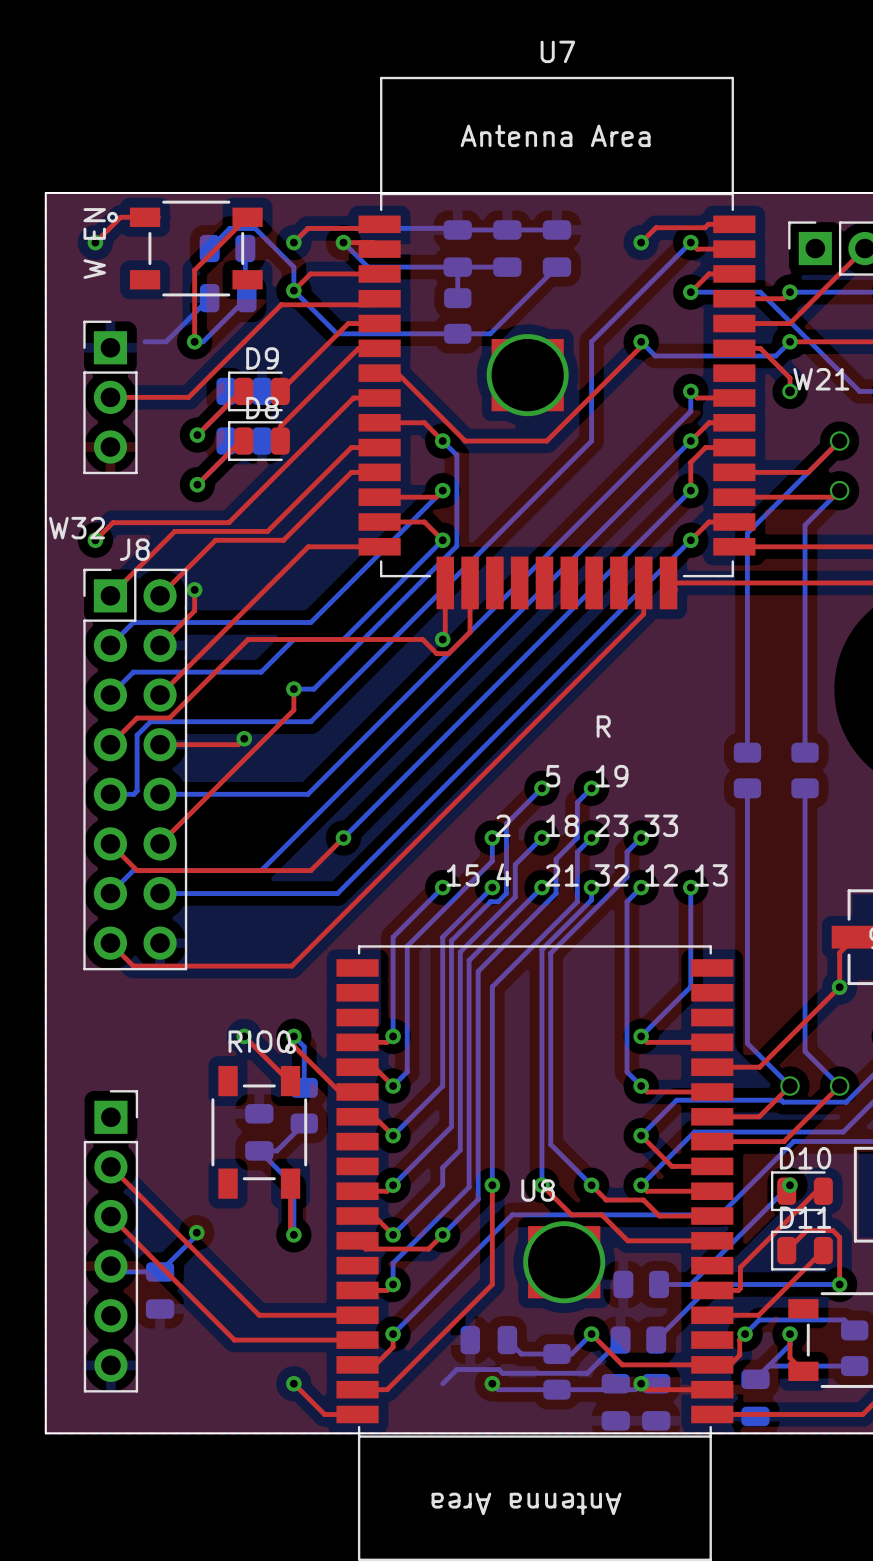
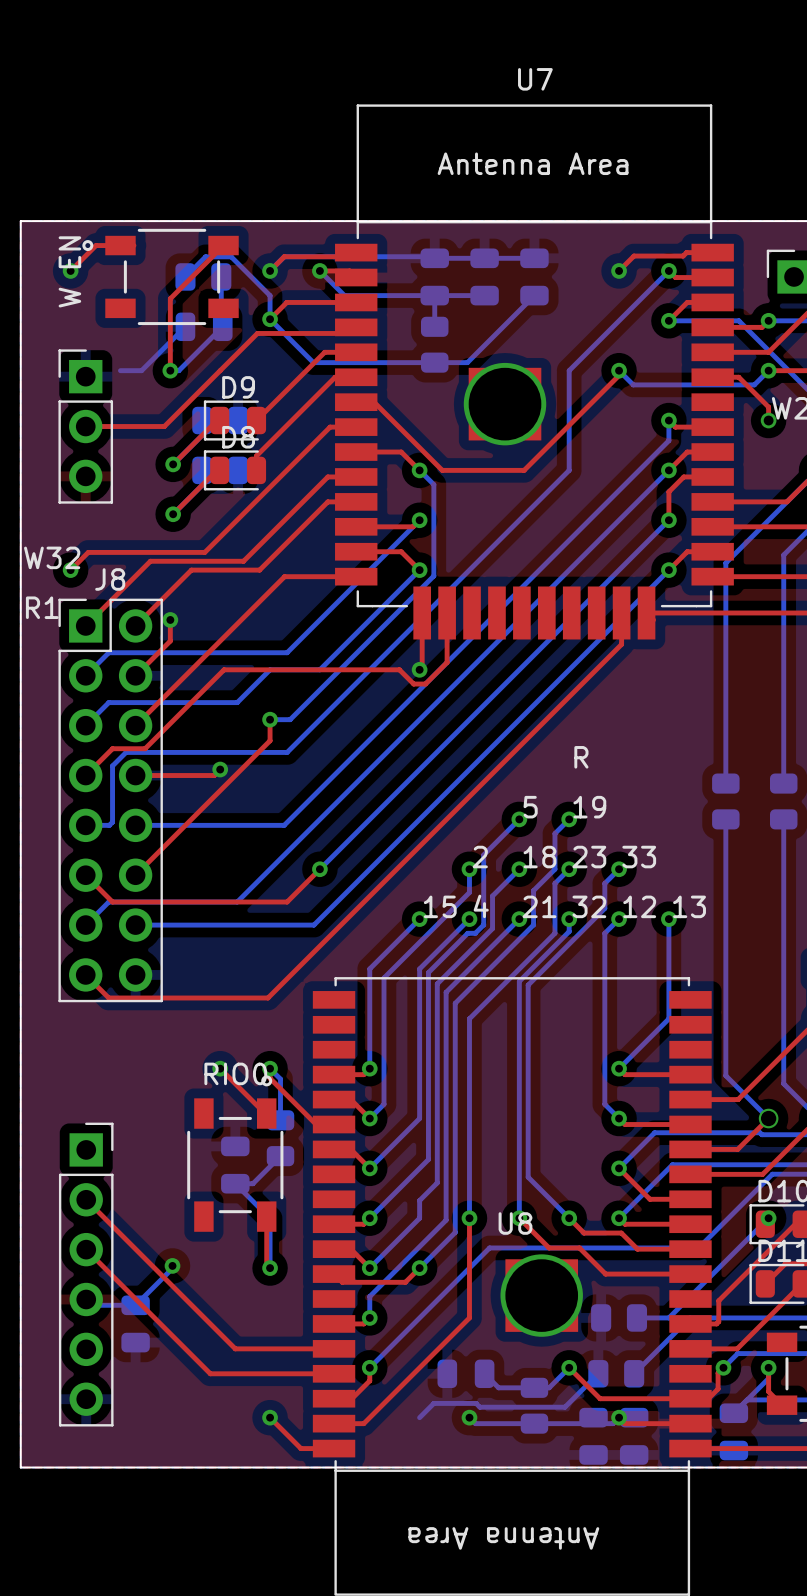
text: none -> R1 (42, 607)

